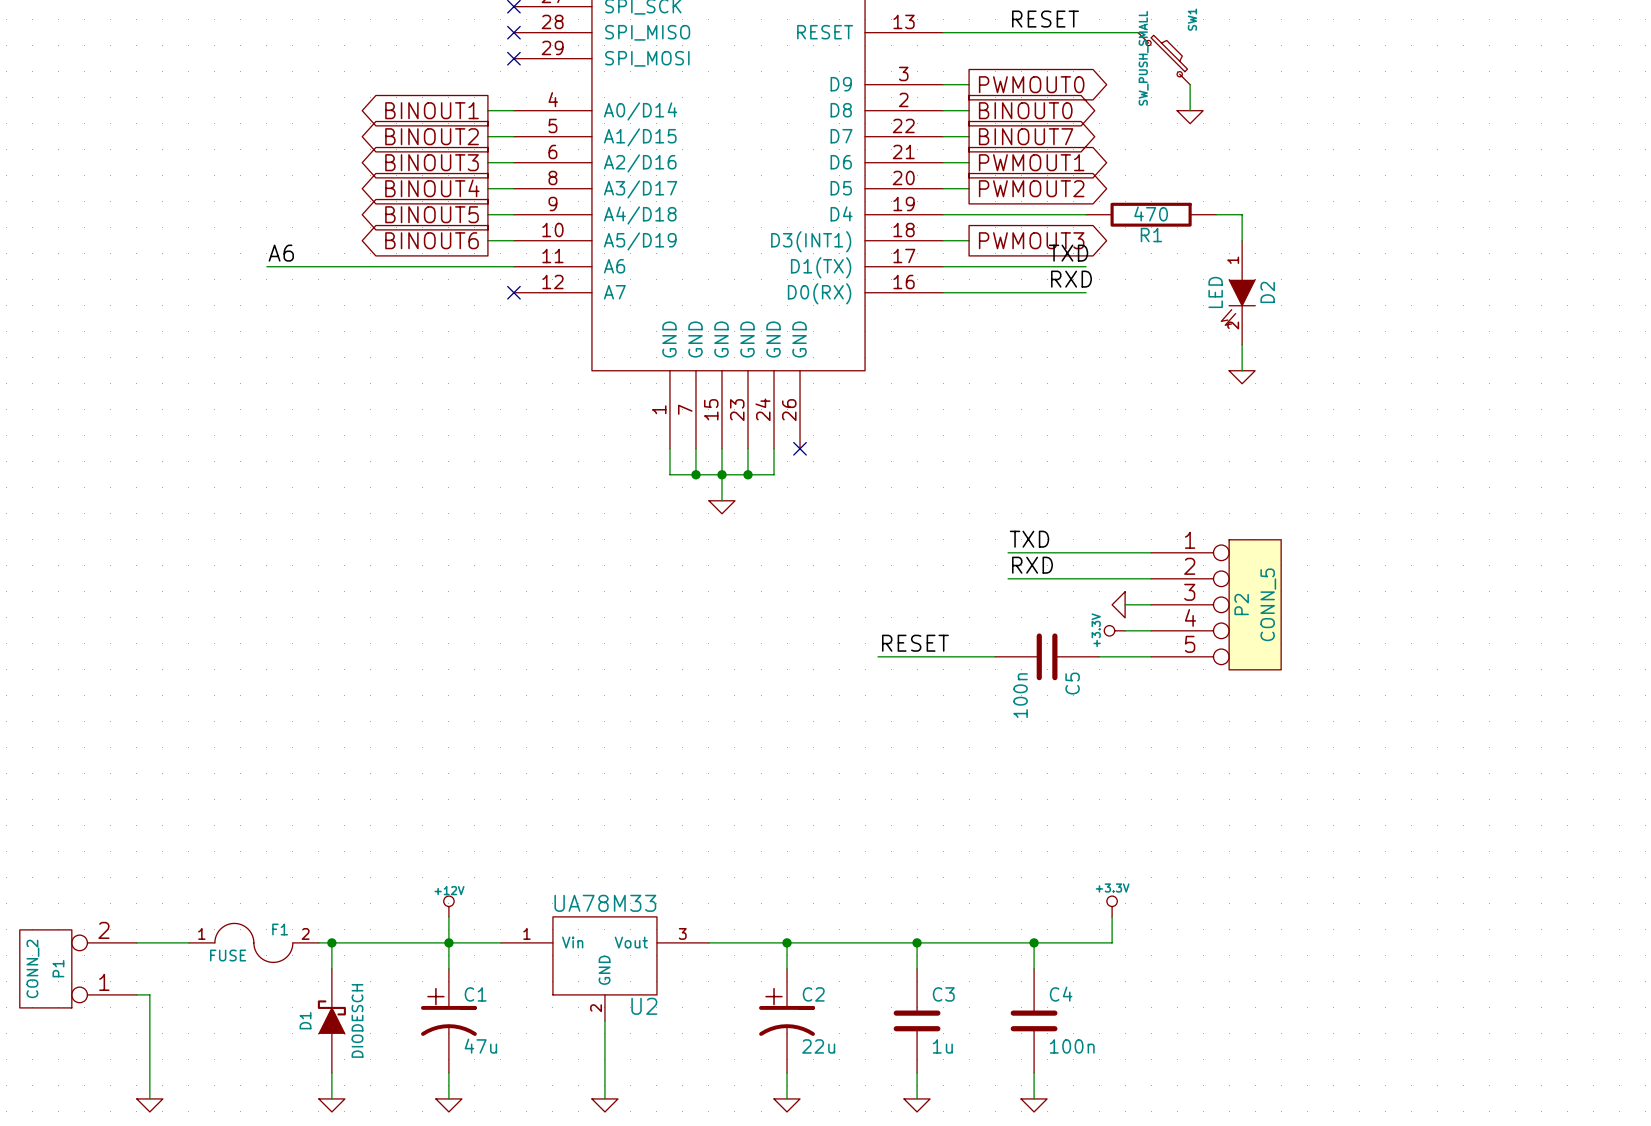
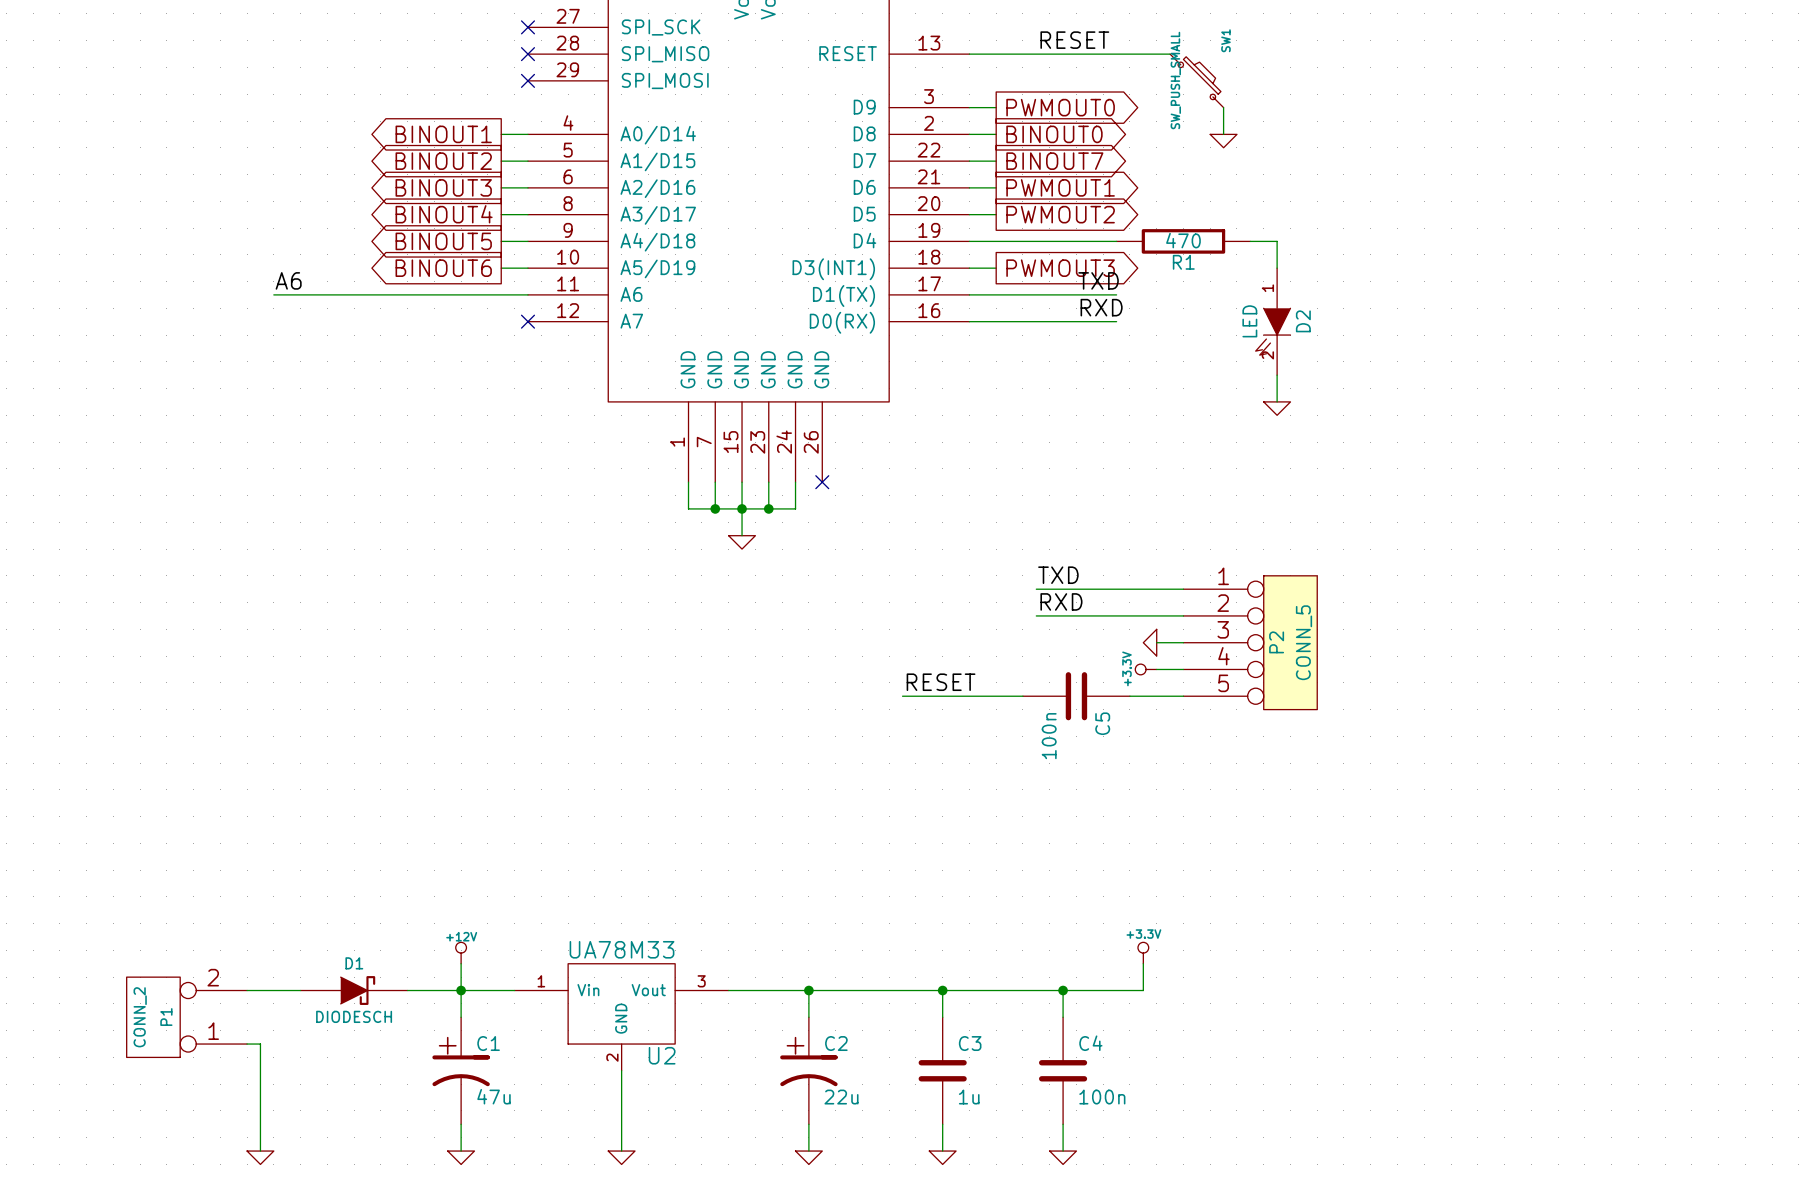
wire: (136, 942) (188, 942) -> (247, 990) (300, 990)
F1: FUSE (253, 942) -> none
junction: (331, 942) -> none
P1 position: (78, 968) -> (186, 1017)
wire: (136, 994) (149, 994) (149, 1098) -> (247, 1044) (260, 1044) (260, 1151)
D1 rotation: 0° (331, 1017) -> 90° clockwise (357, 990)
D1 position: (331, 1020) -> (354, 990)
wire: (331, 1072) (331, 1098) -> none
power symbol: (149, 1105) -> none
power symbol: none -> (260, 1157)
power symbol: (331, 1105) -> none

